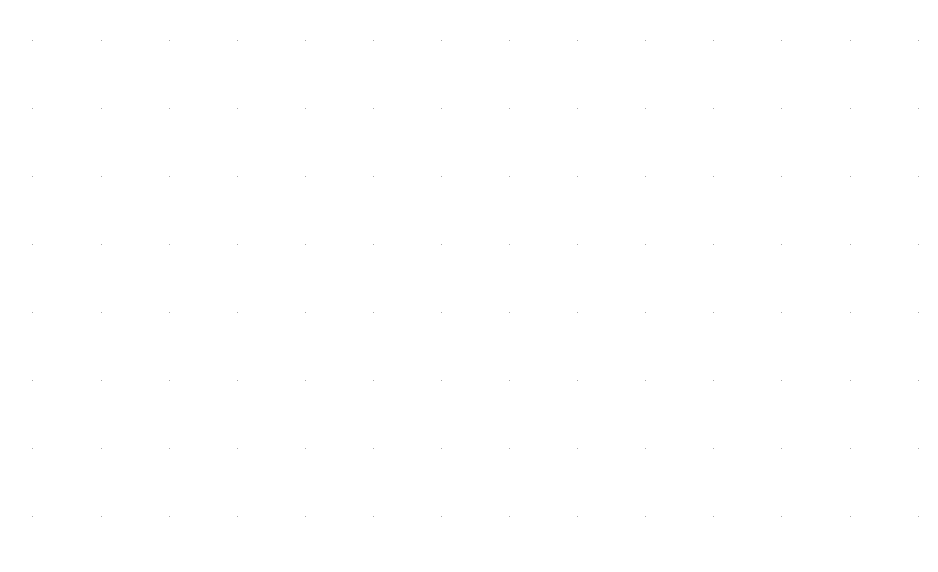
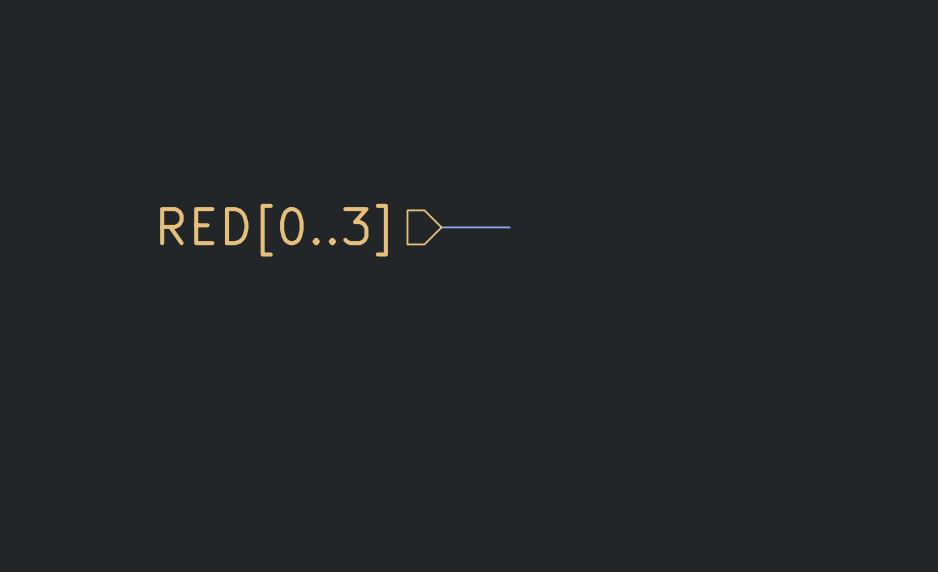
bus: none -> (441, 227) (509, 227)
hierarchical label: none -> RED[0..3] (274, 230)

